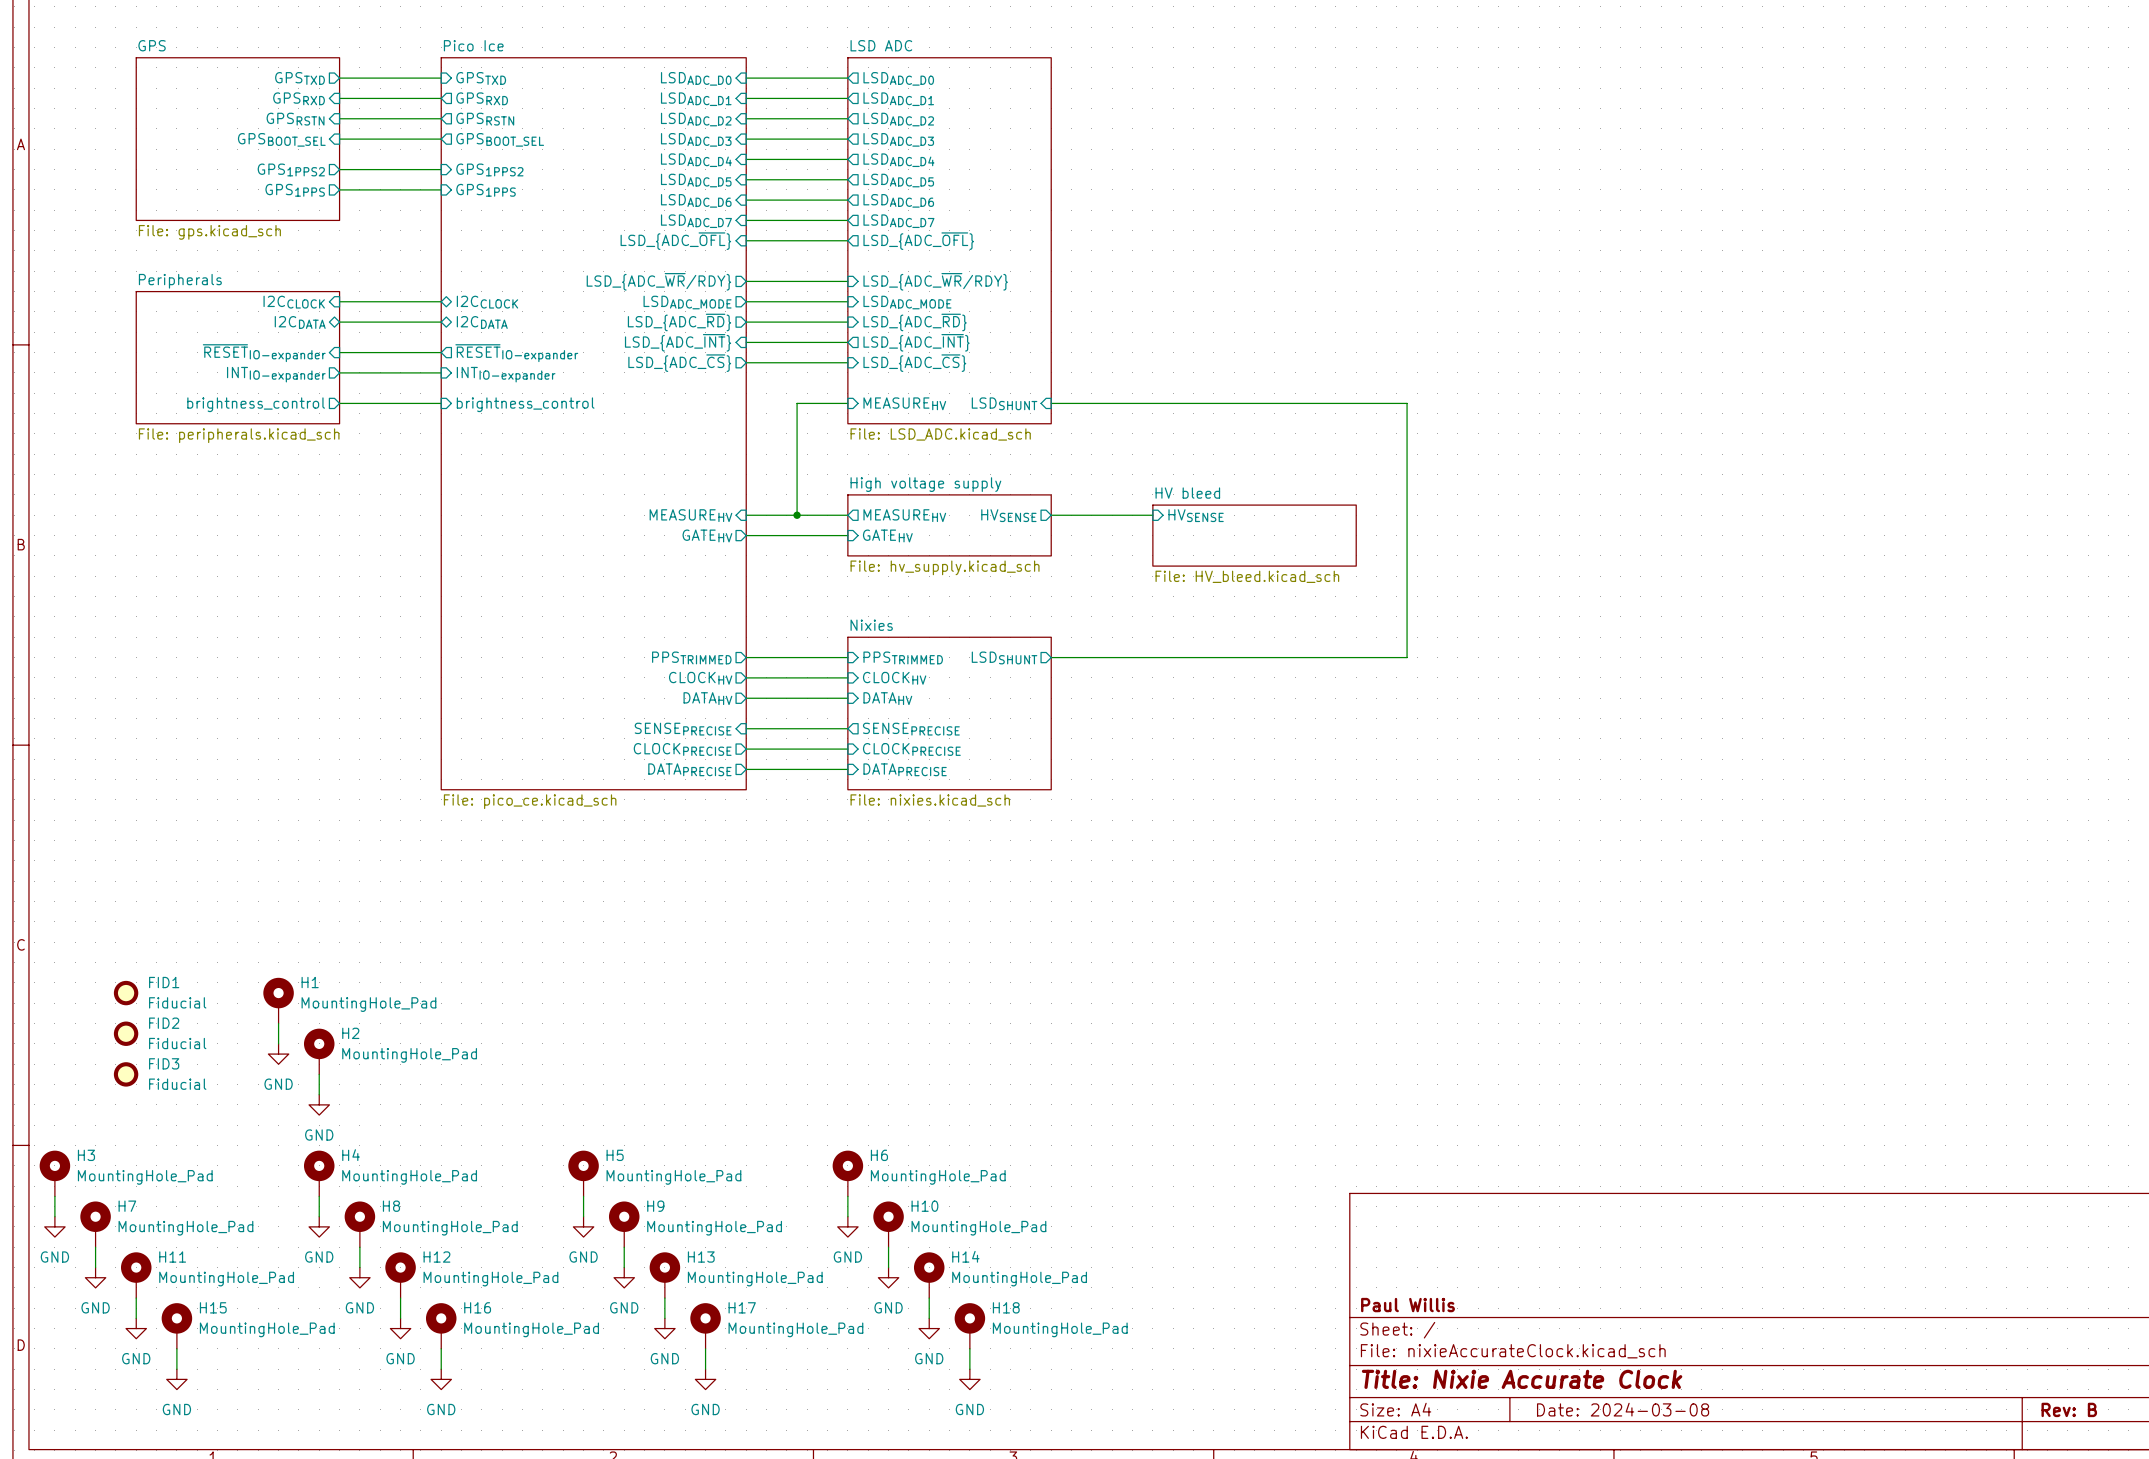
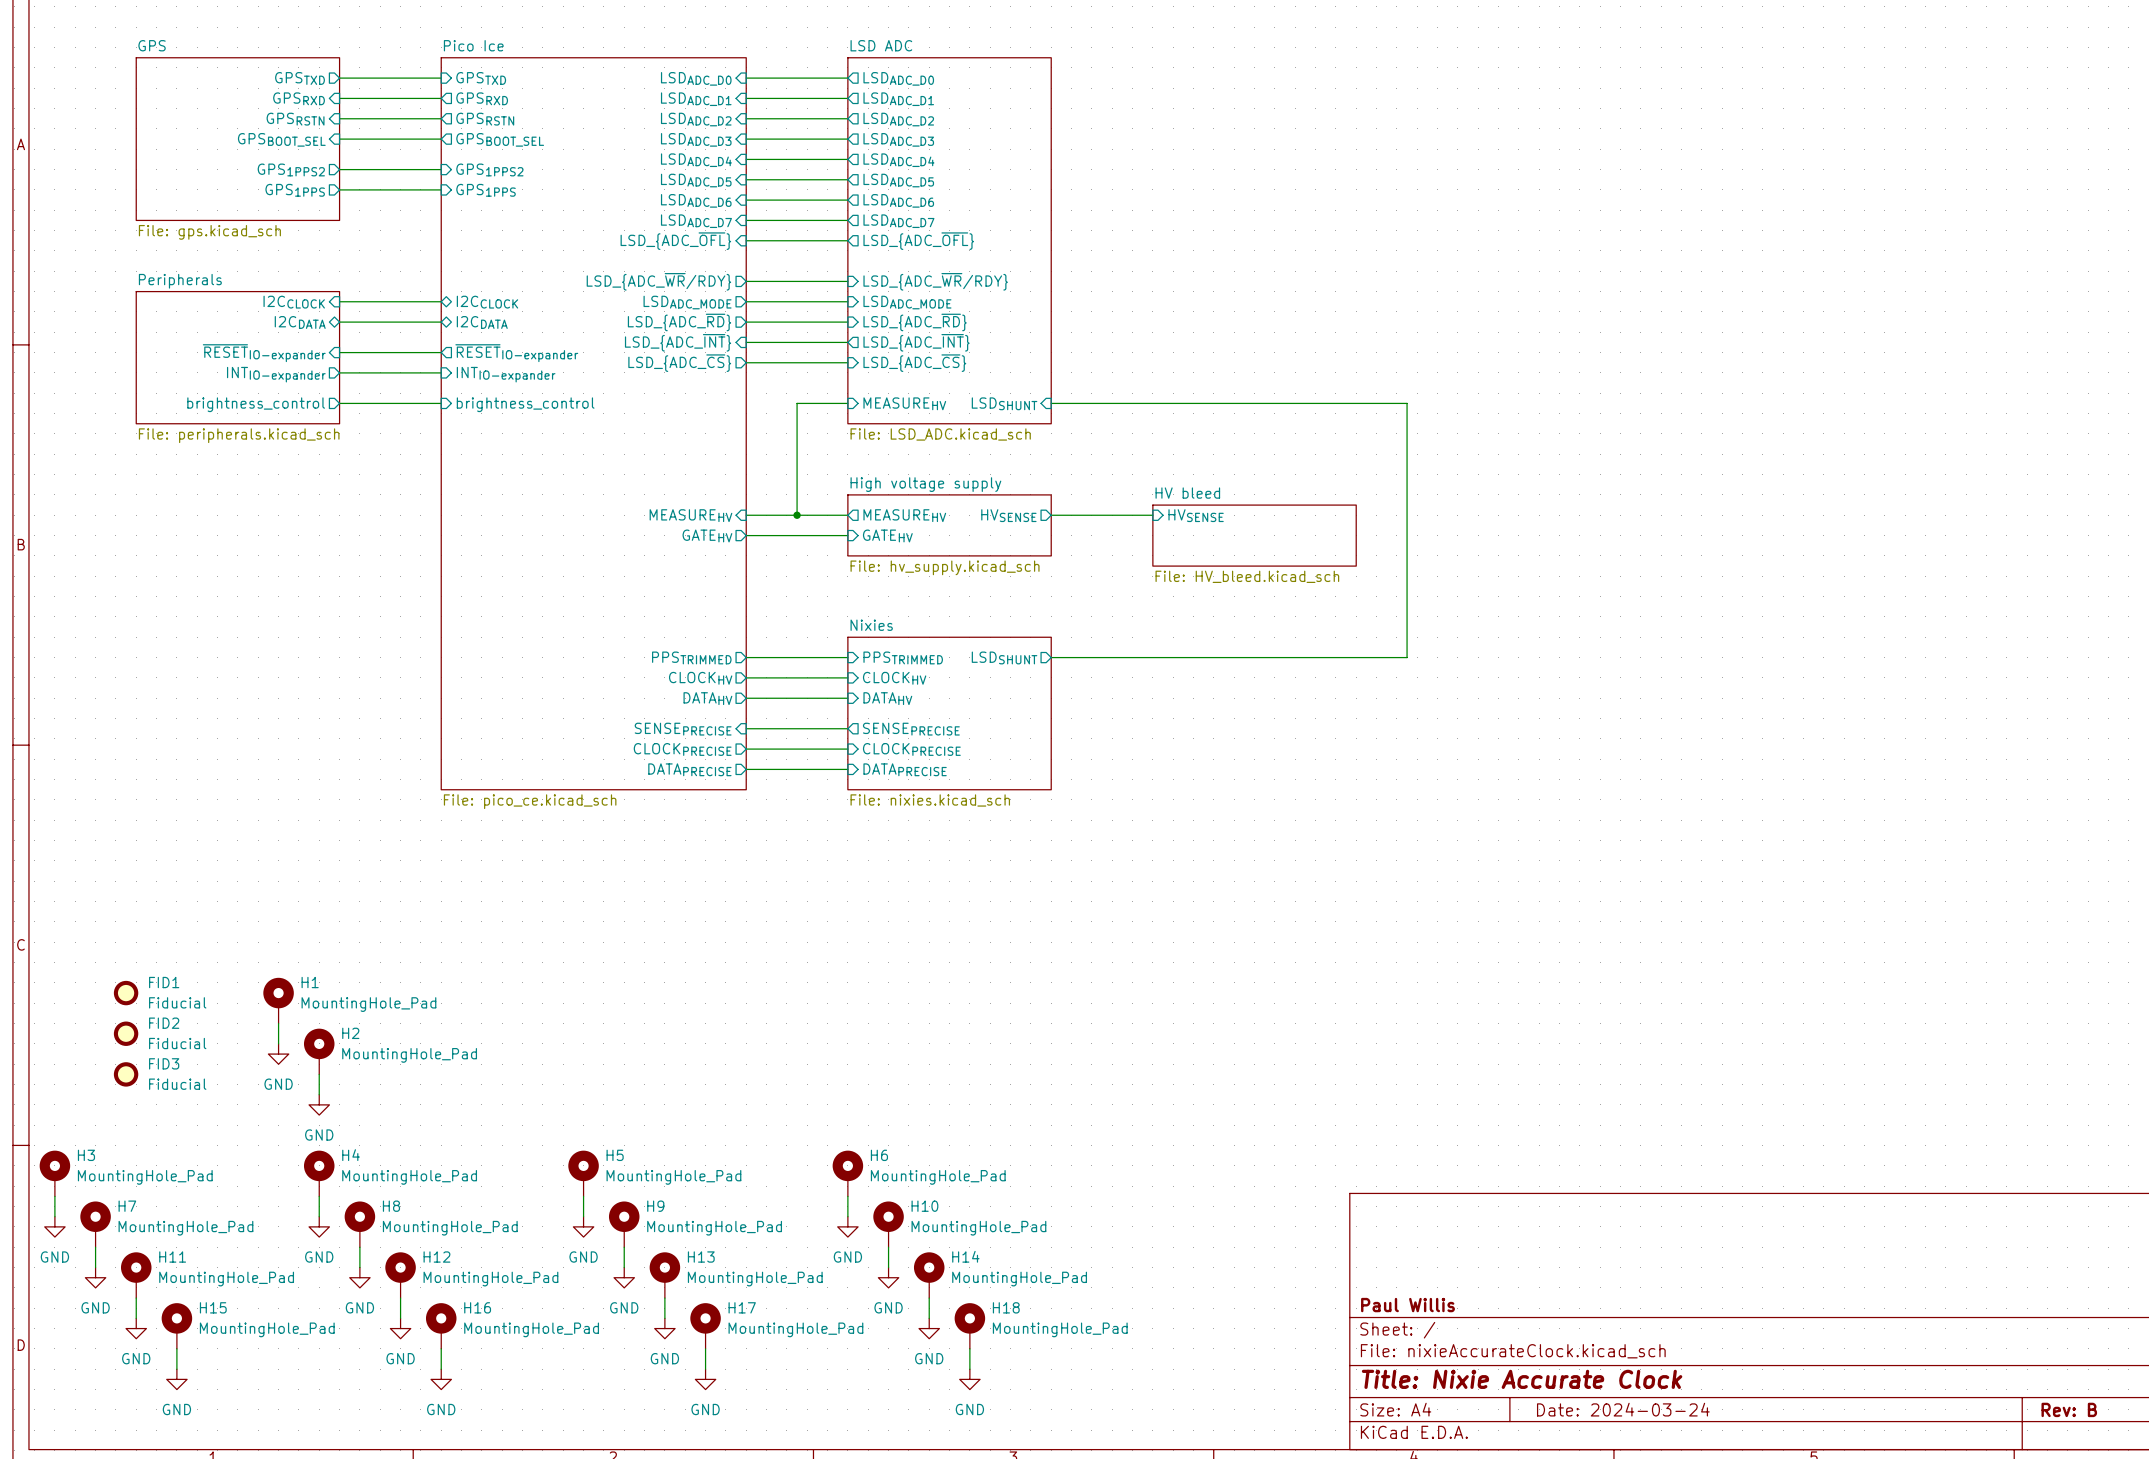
title block: Date: 2024-03-08 (1623, 1409) -> Date: 2024-03-24 (1623, 1409)

